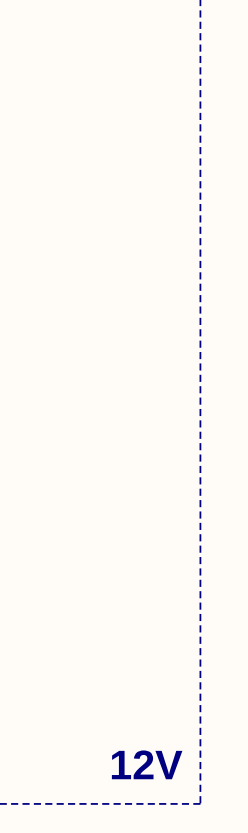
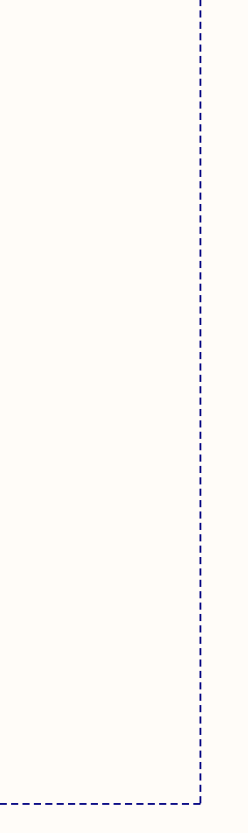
text: 12V (147, 764) -> none

